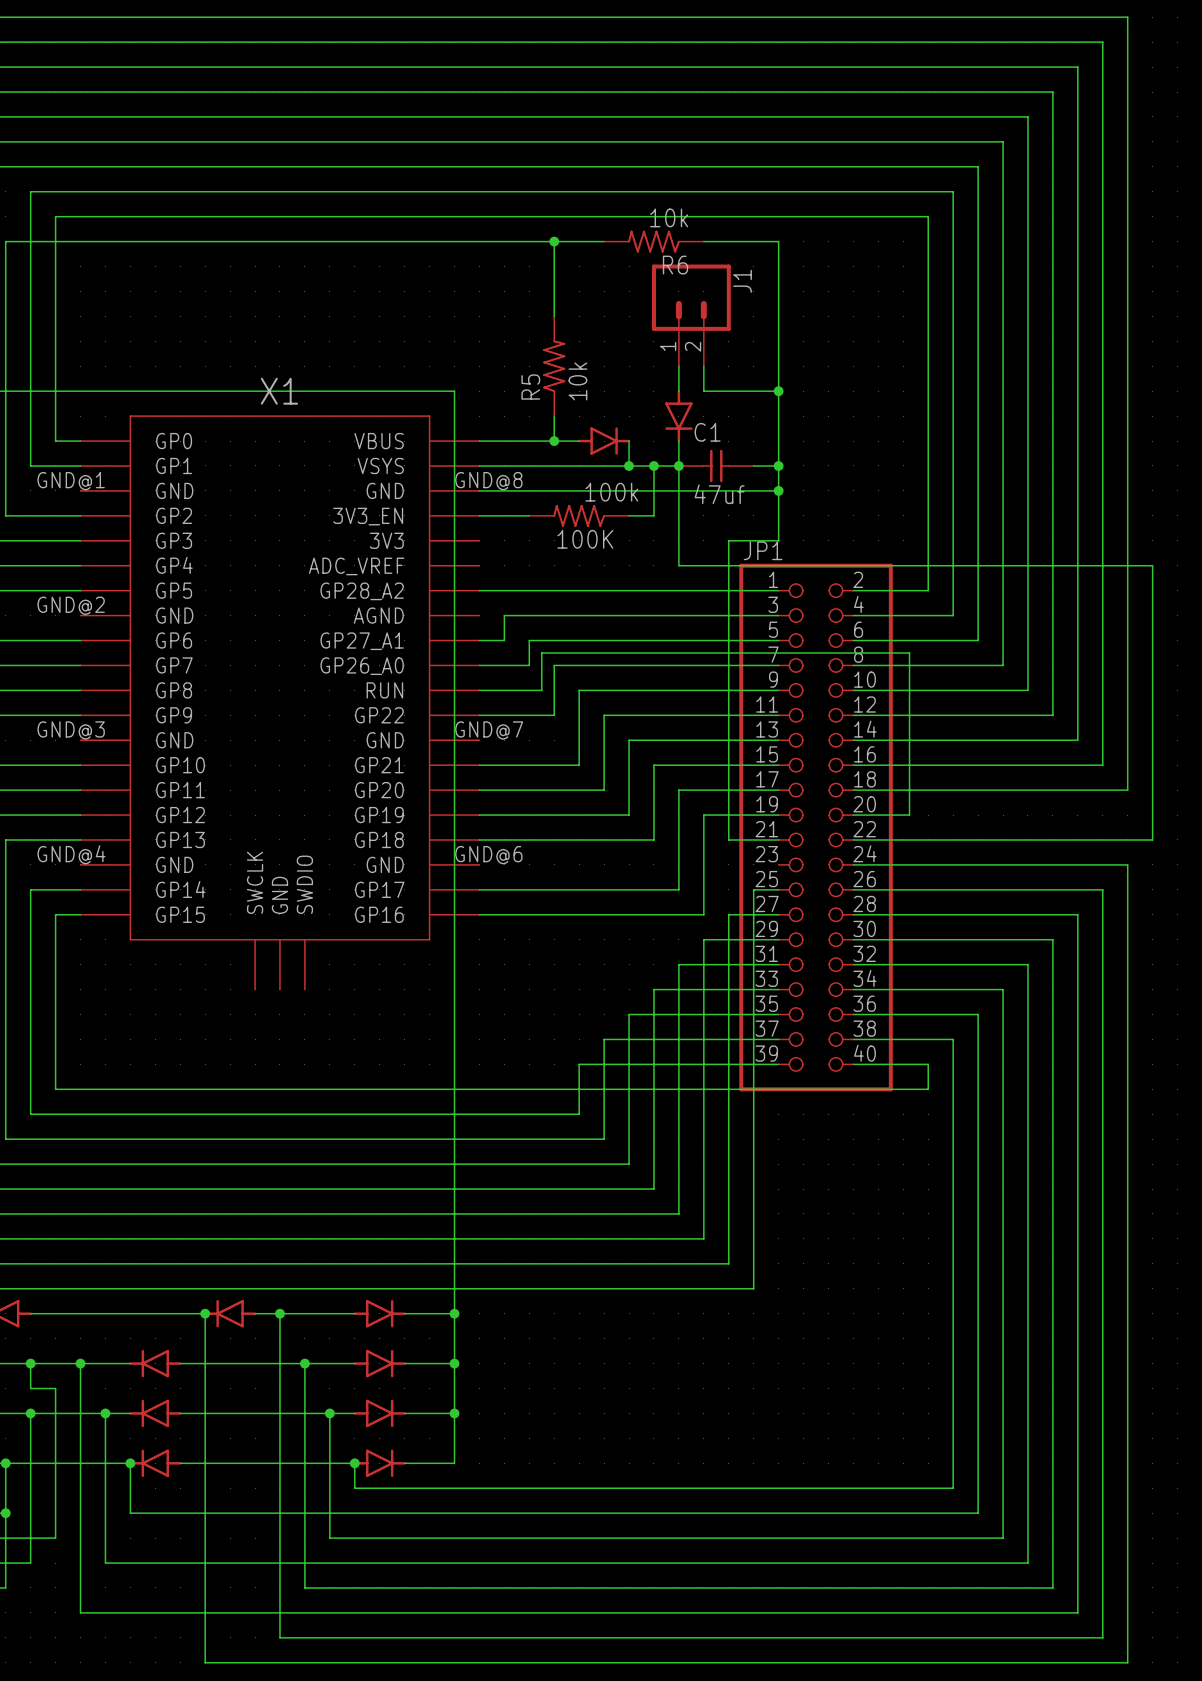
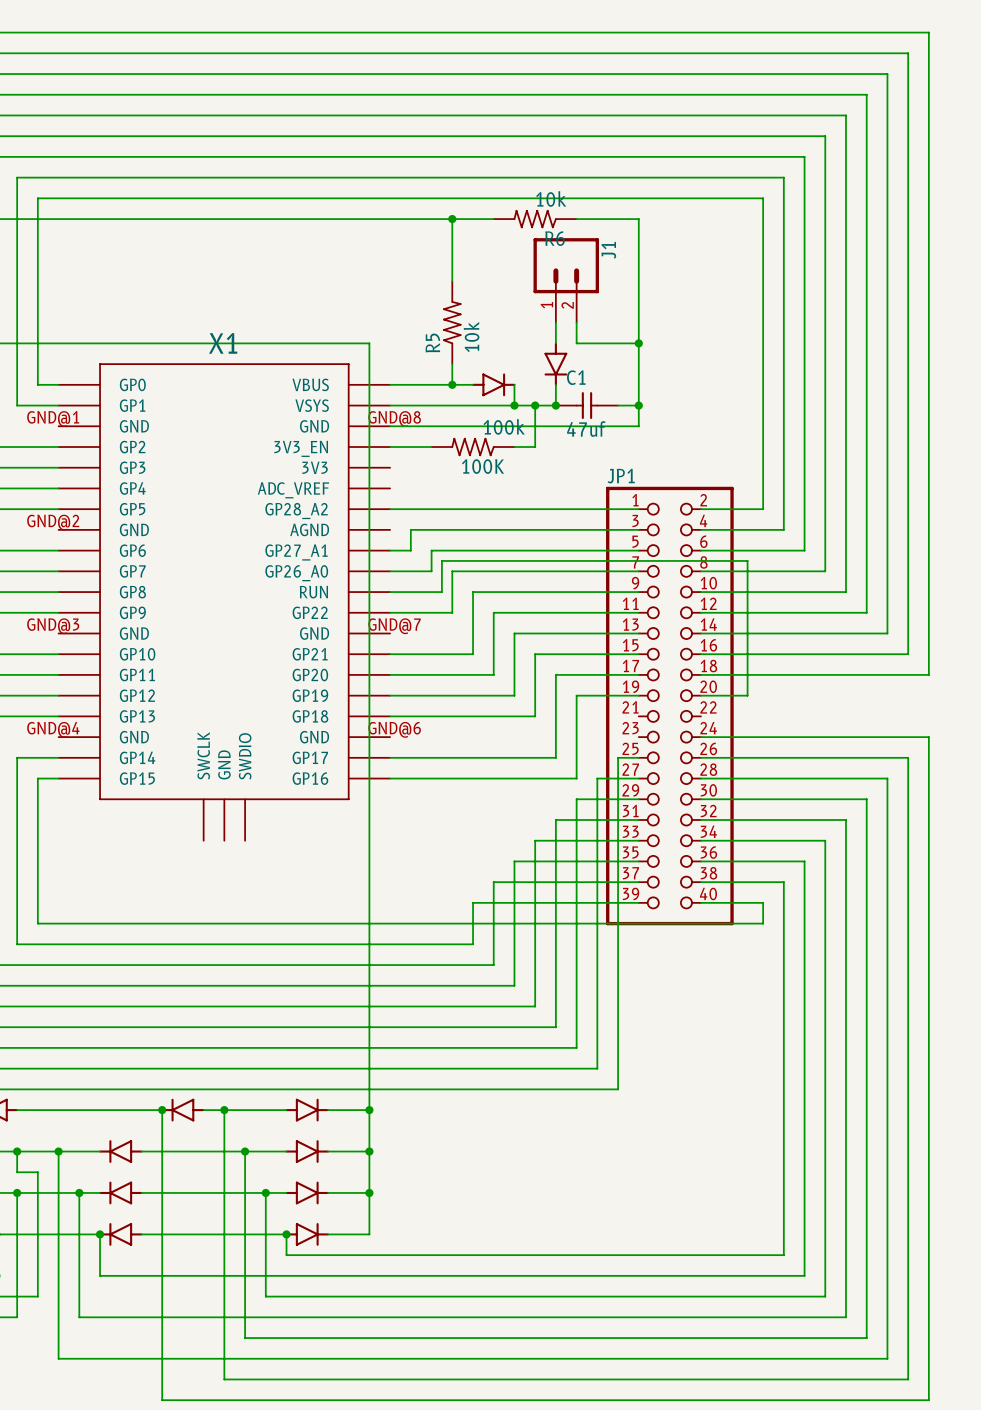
wire: (678, 465) (678, 565) (1152, 565) (1152, 839) (853, 839) -> none
wire: (778, 490) (778, 540) (728, 540) (728, 839) (778, 839) -> none
junction: (778, 490) -> none

